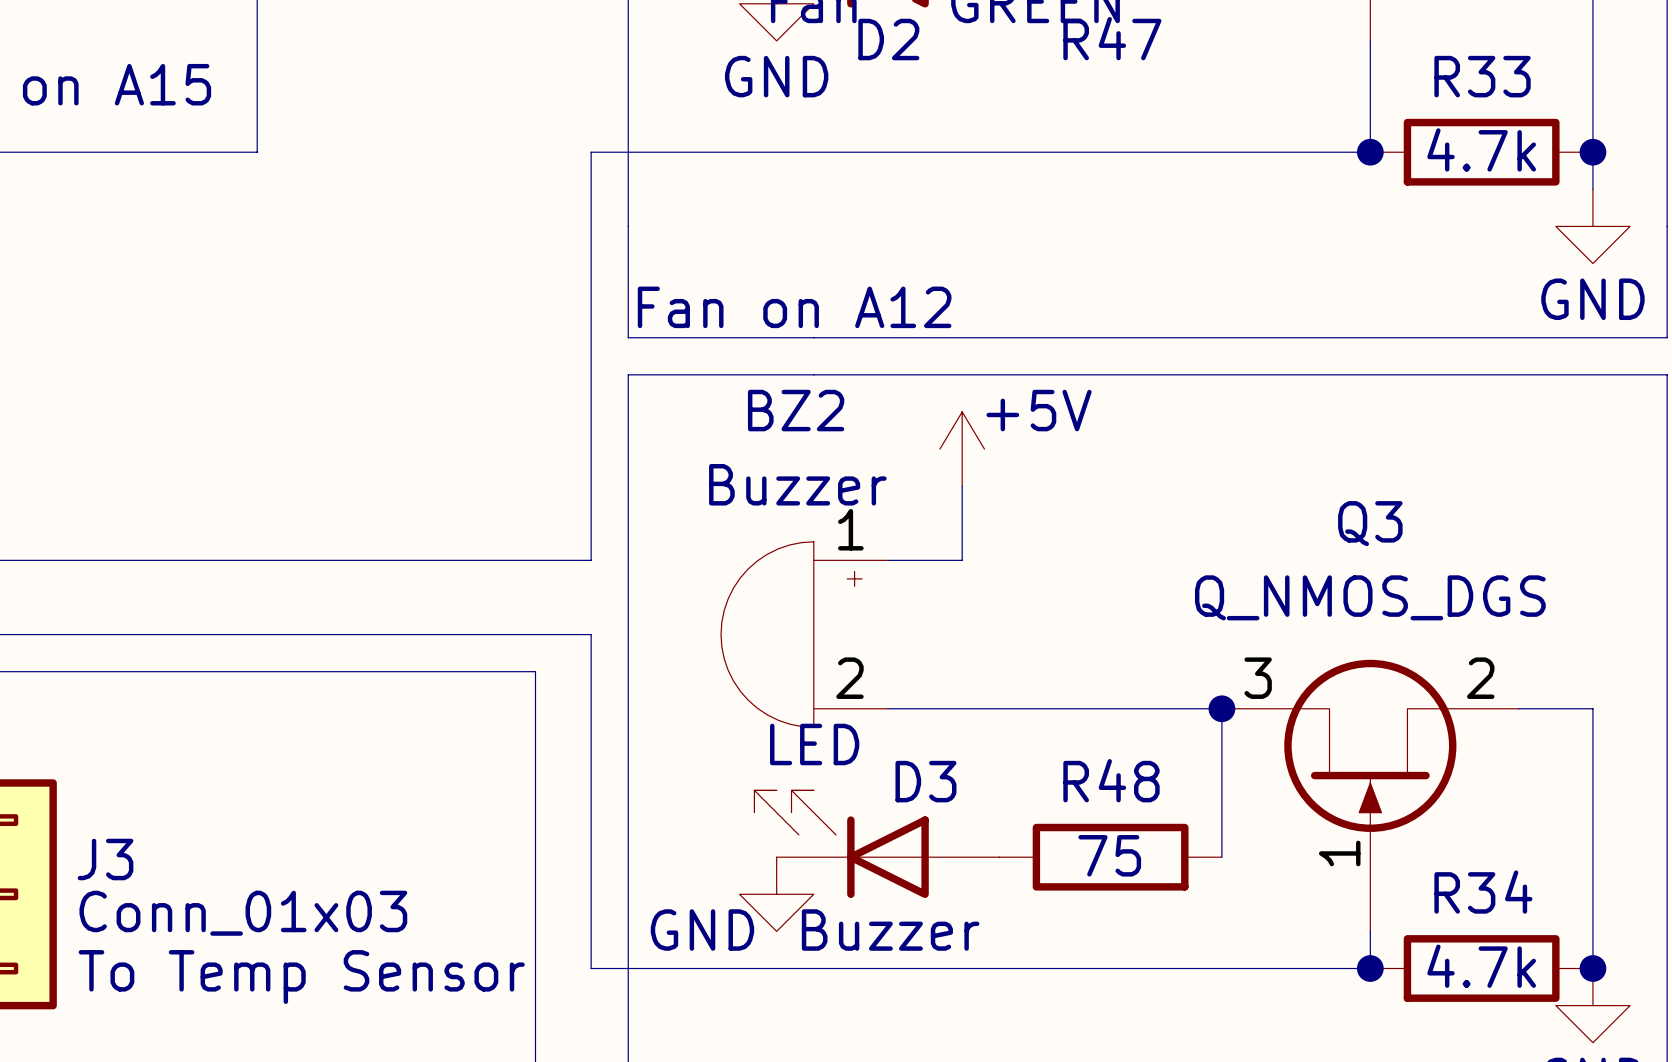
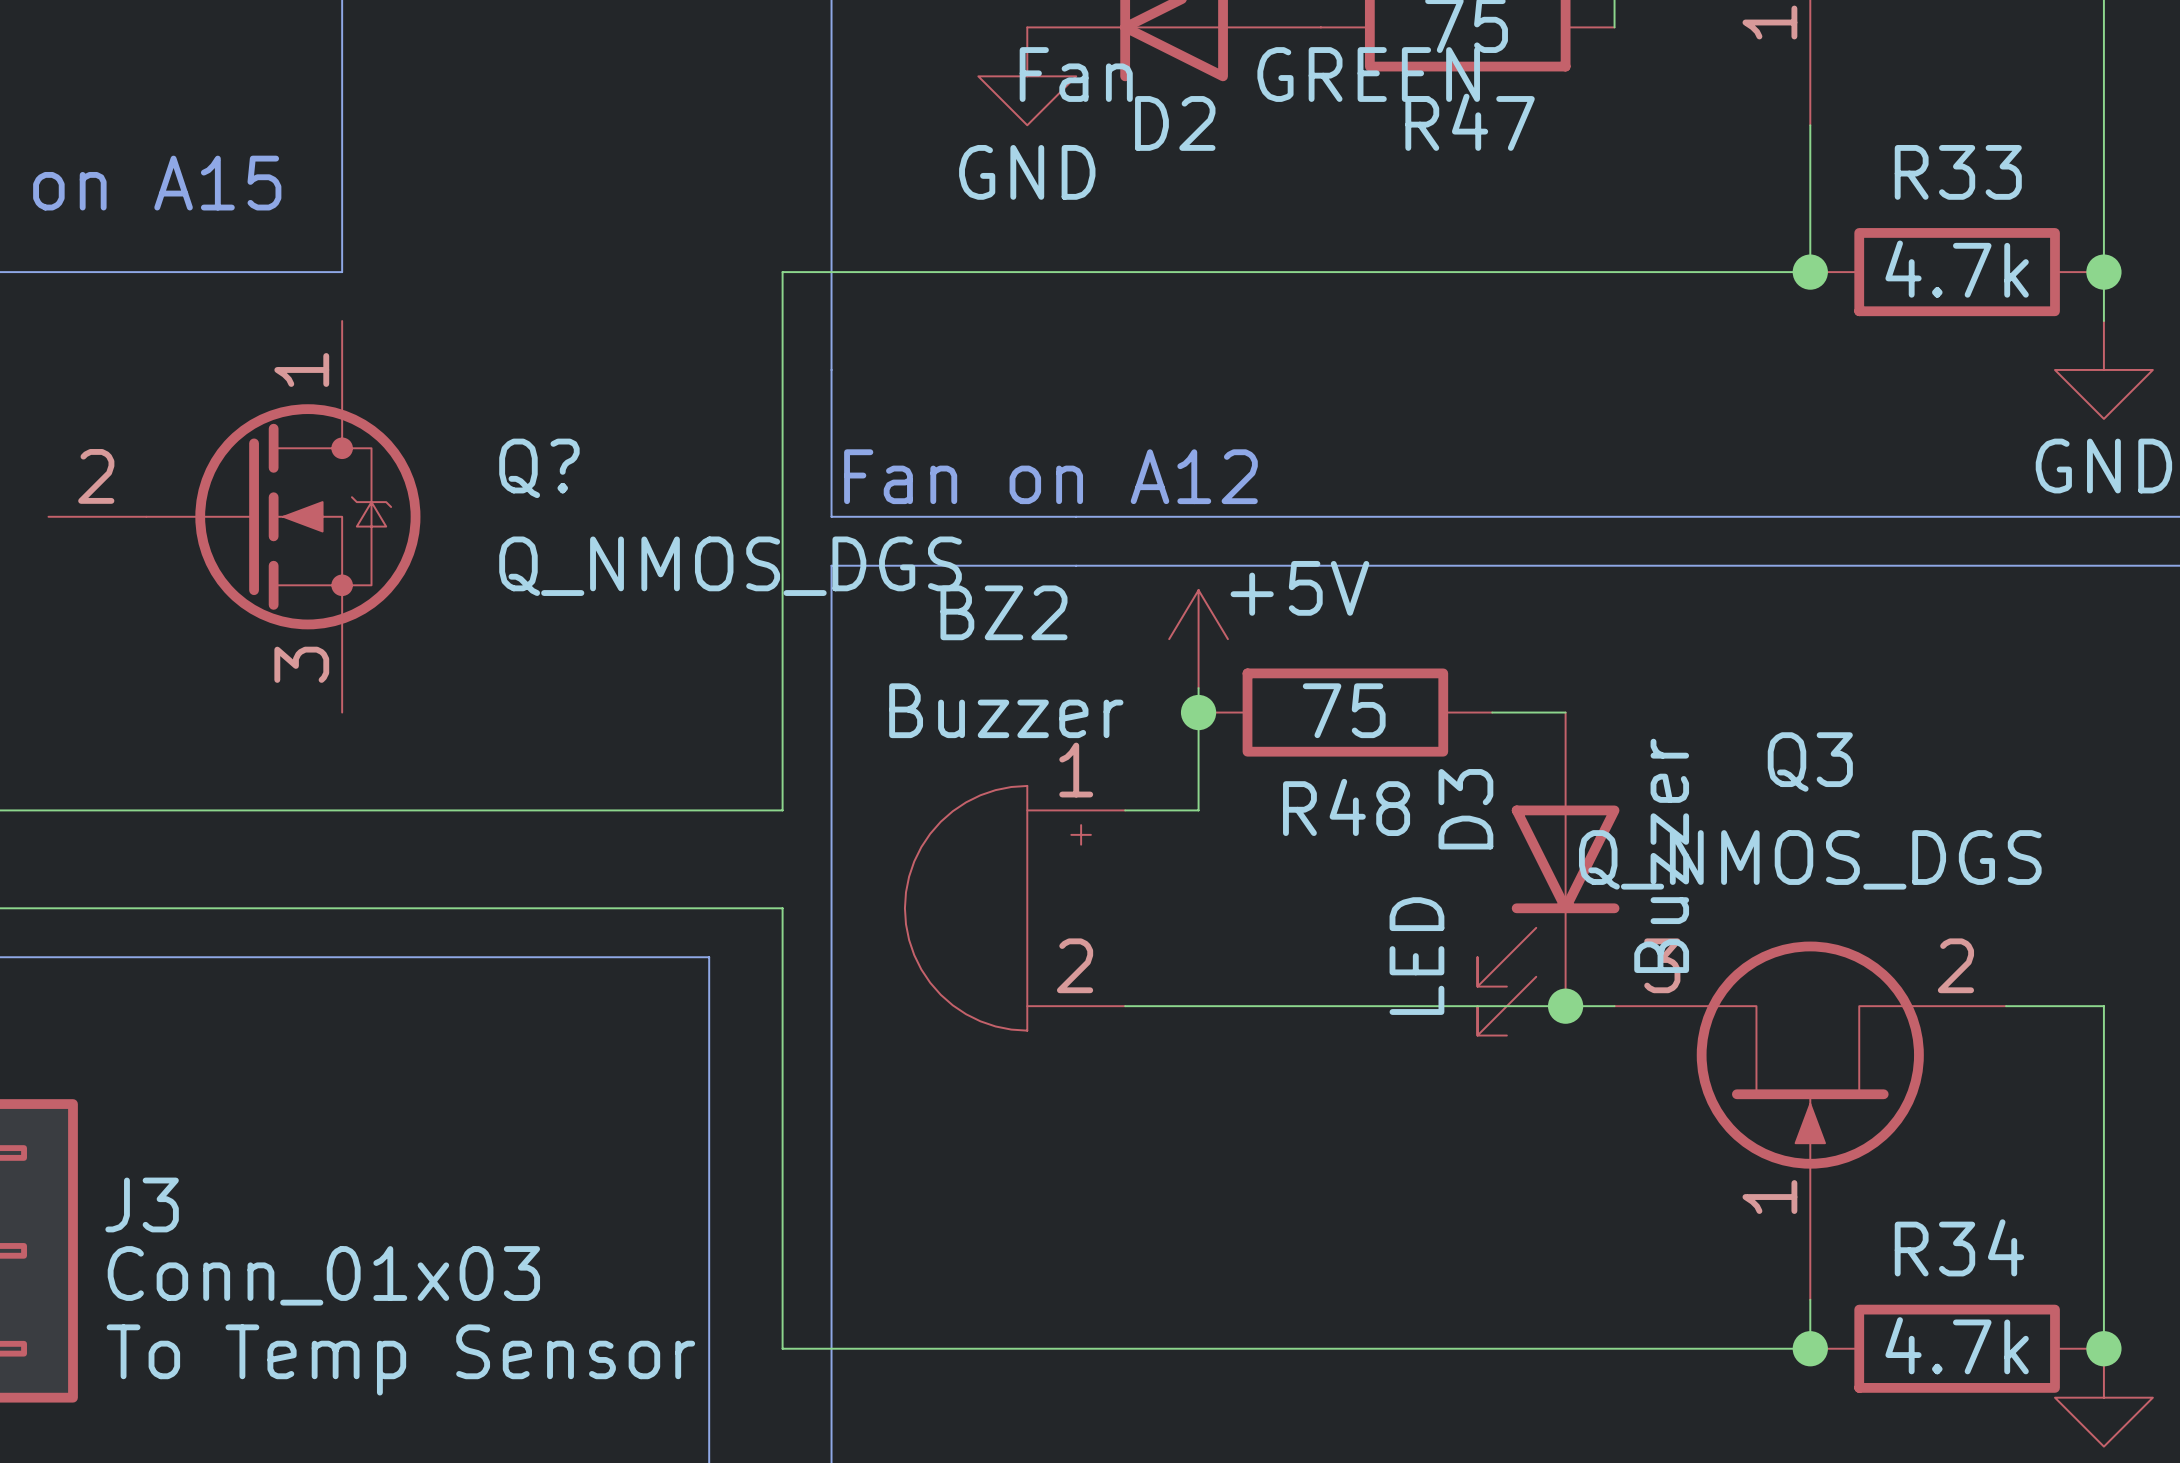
Q?: none -> Q_NMOS_DGS (234, 516)
power symbol position: +5V (962, 449) -> +5V (1198, 639)
junction: none -> (1198, 712)
wire: (962, 486) (962, 560) (906, 560) -> (1198, 688) (1198, 810)
wire: none -> (1492, 712) (1565, 712)
BZ2 position: (804, 634) -> (1015, 908)
wire: (1221, 708) (1221, 857) -> none
junction position: (1221, 708) -> (1565, 1006)
R48 name position: R48 (1111, 780) -> R48 (1346, 807)
D3 rotation: 0° (841, 844) -> 90° counterclockwise (1548, 920)
D3 position: (876, 844) -> (1548, 874)
R48 position: (1110, 857) -> (1345, 712)
power symbol: GND (776, 894) -> none

